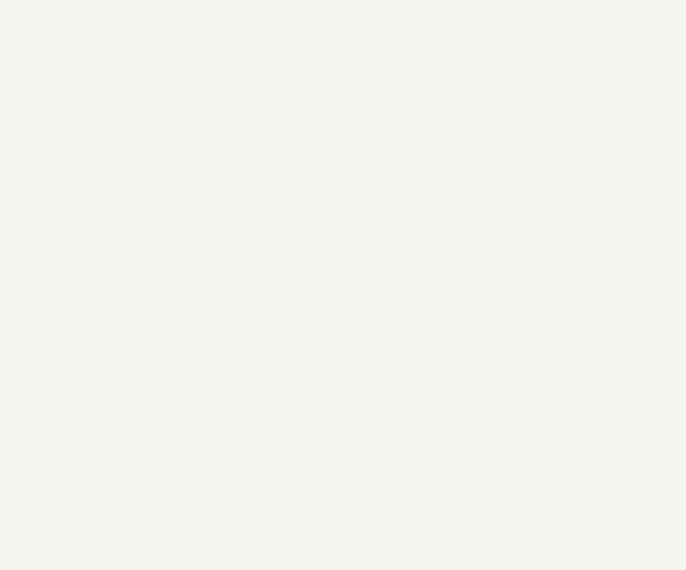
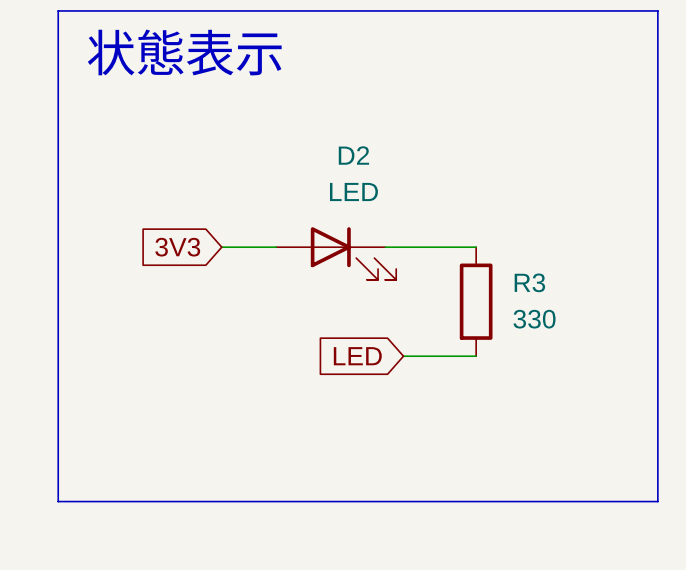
line: none -> (58, 10) (657, 10) (657, 501) (58, 501) (58, 10)
text: none -> 状態表示 (184, 52)
global label: none -> 3V3 (177, 247)
wire: none -> (221, 247) (276, 247)
wire: none -> (385, 247) (476, 247)
D2: none -> LED (336, 253)
R3: none -> 330 (476, 301)
global label: none -> LED (357, 356)
wire: none -> (403, 356) (476, 356)

